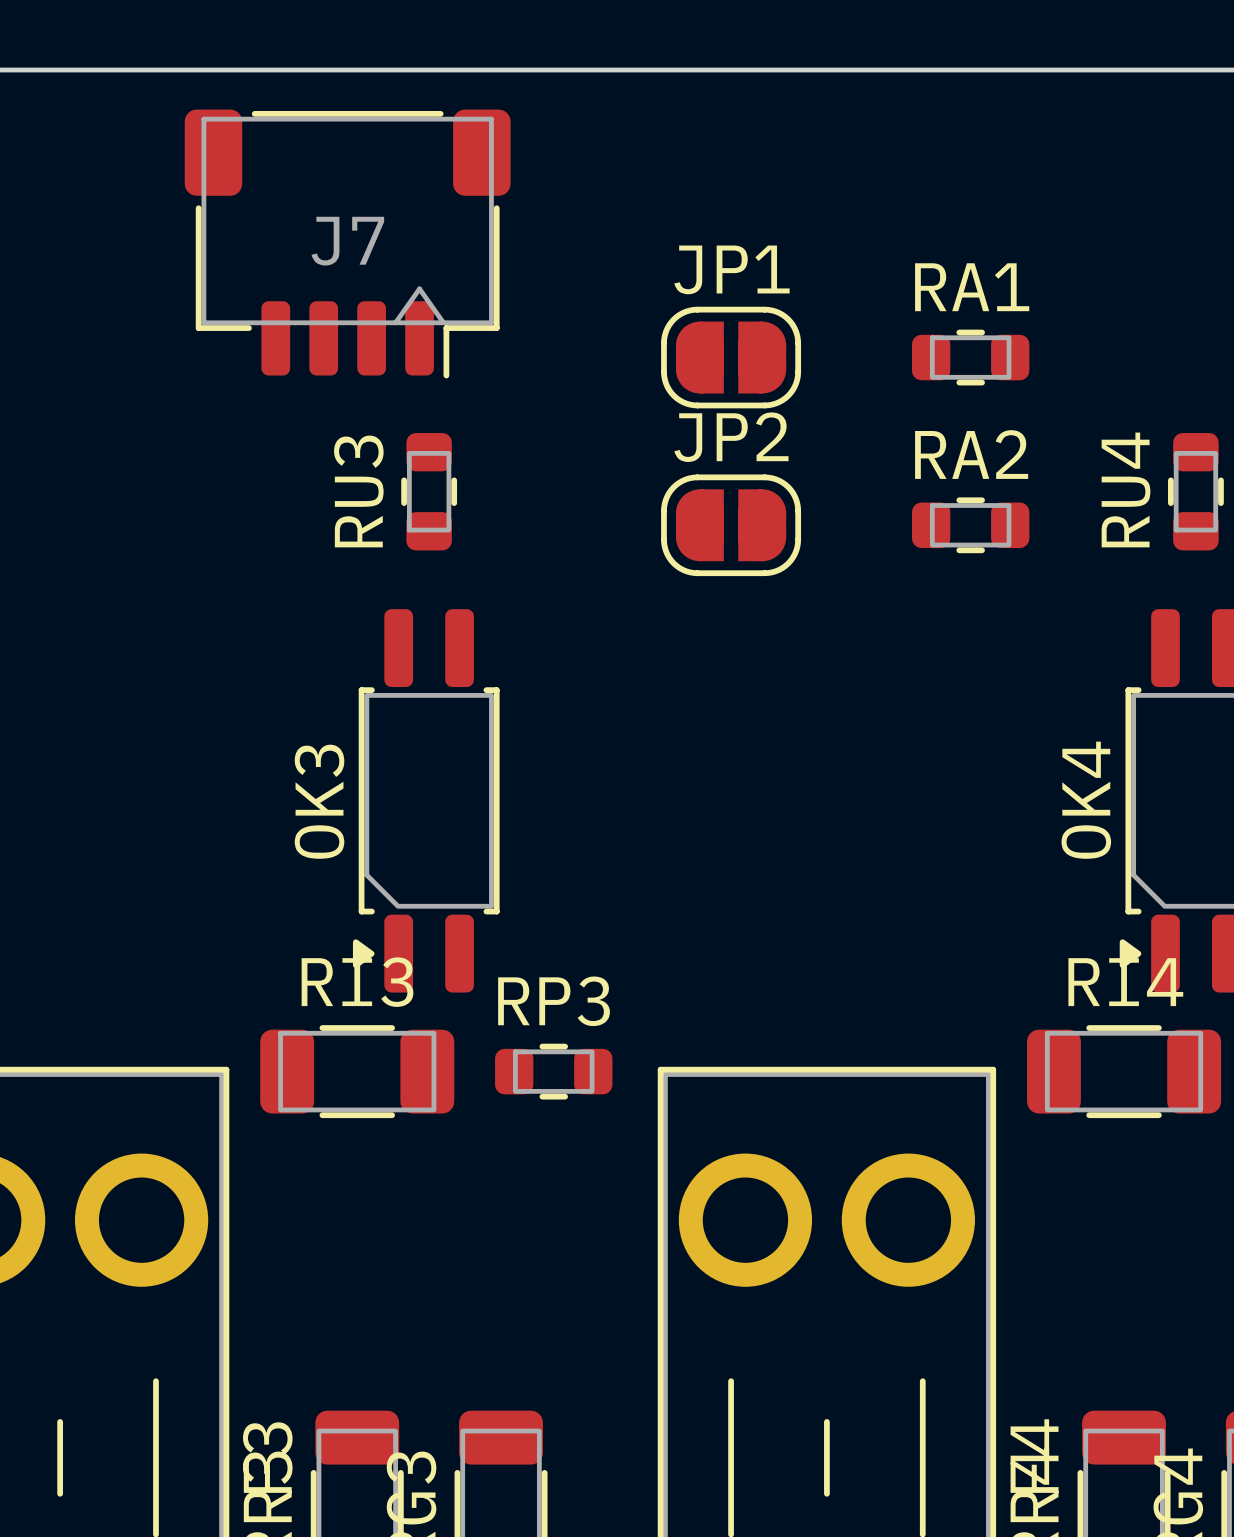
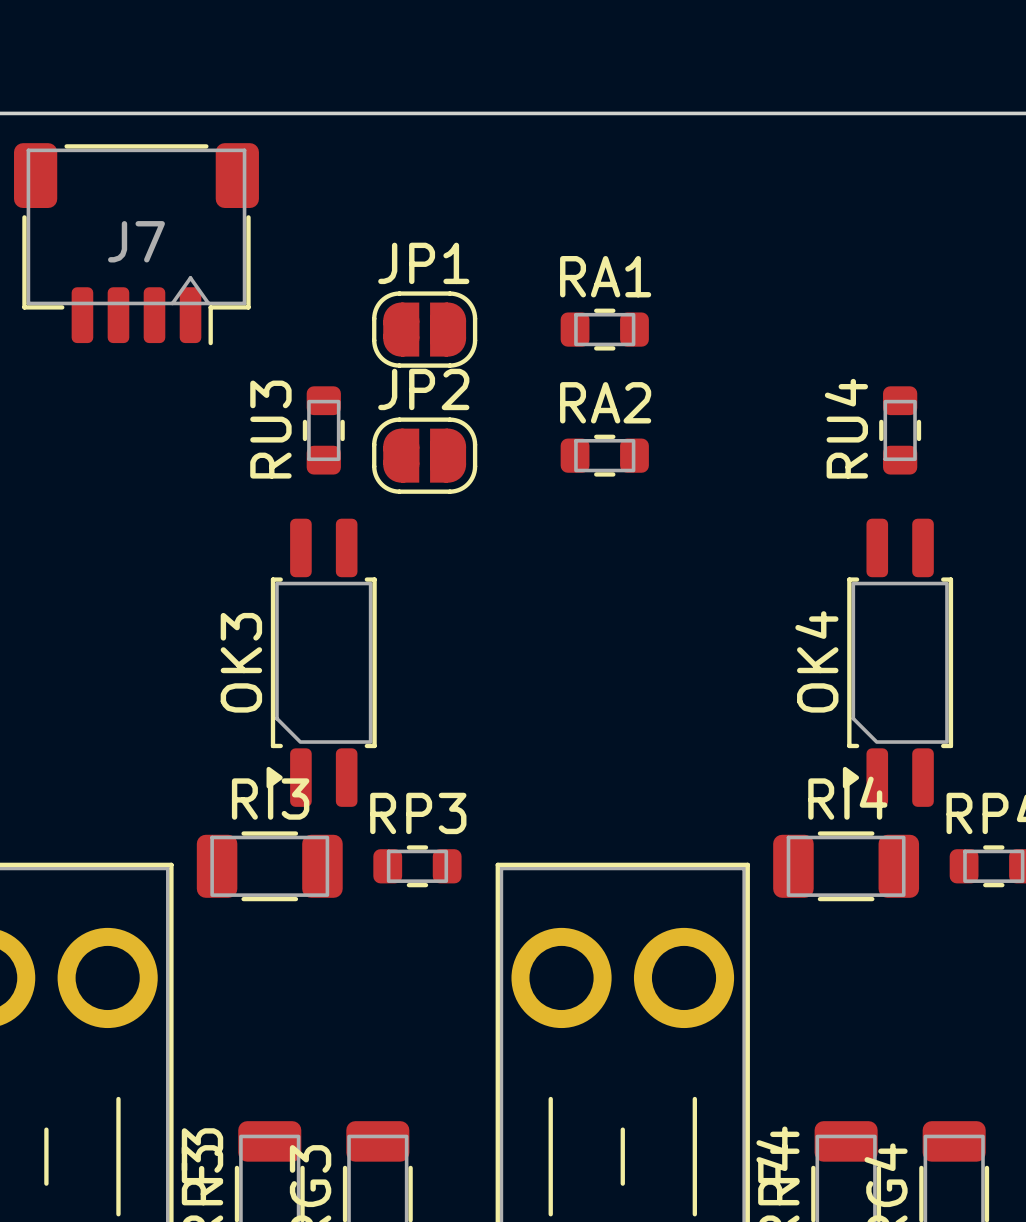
J7 position: (347, 243) -> (136, 244)
JP1 position: (731, 357) -> (424, 329)
RA1 position: (970, 357) -> (604, 329)
JP2 position: (731, 525) -> (424, 455)
RA2 position: (970, 525) -> (604, 455)

